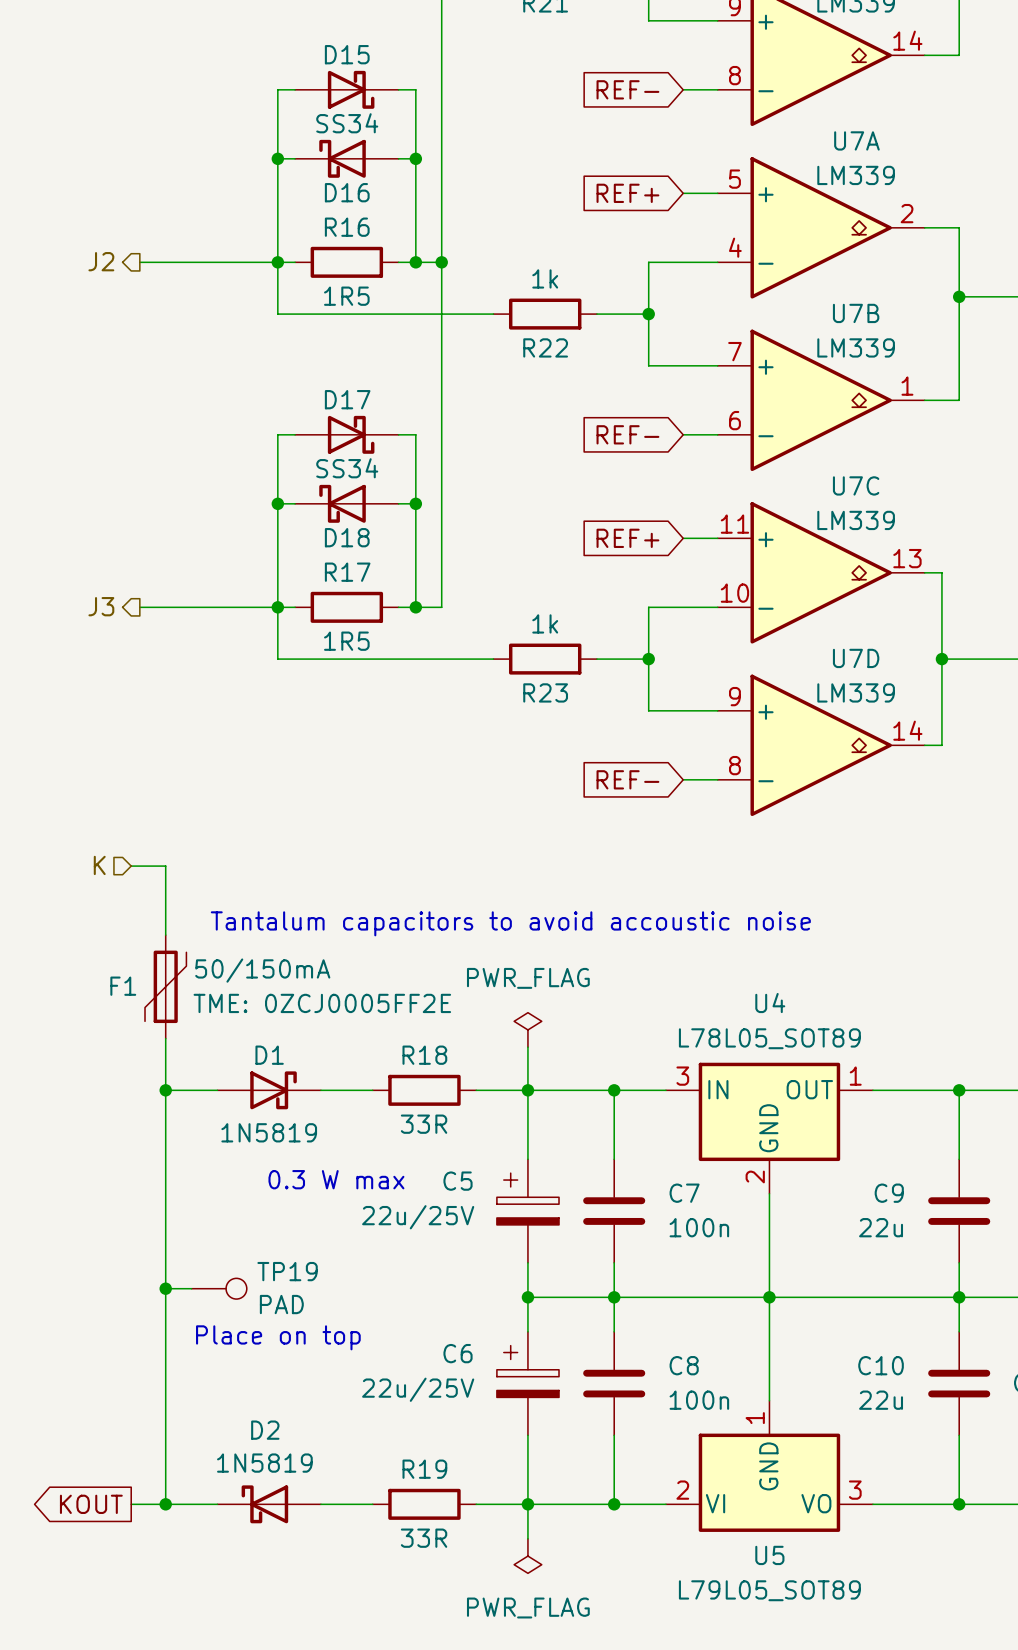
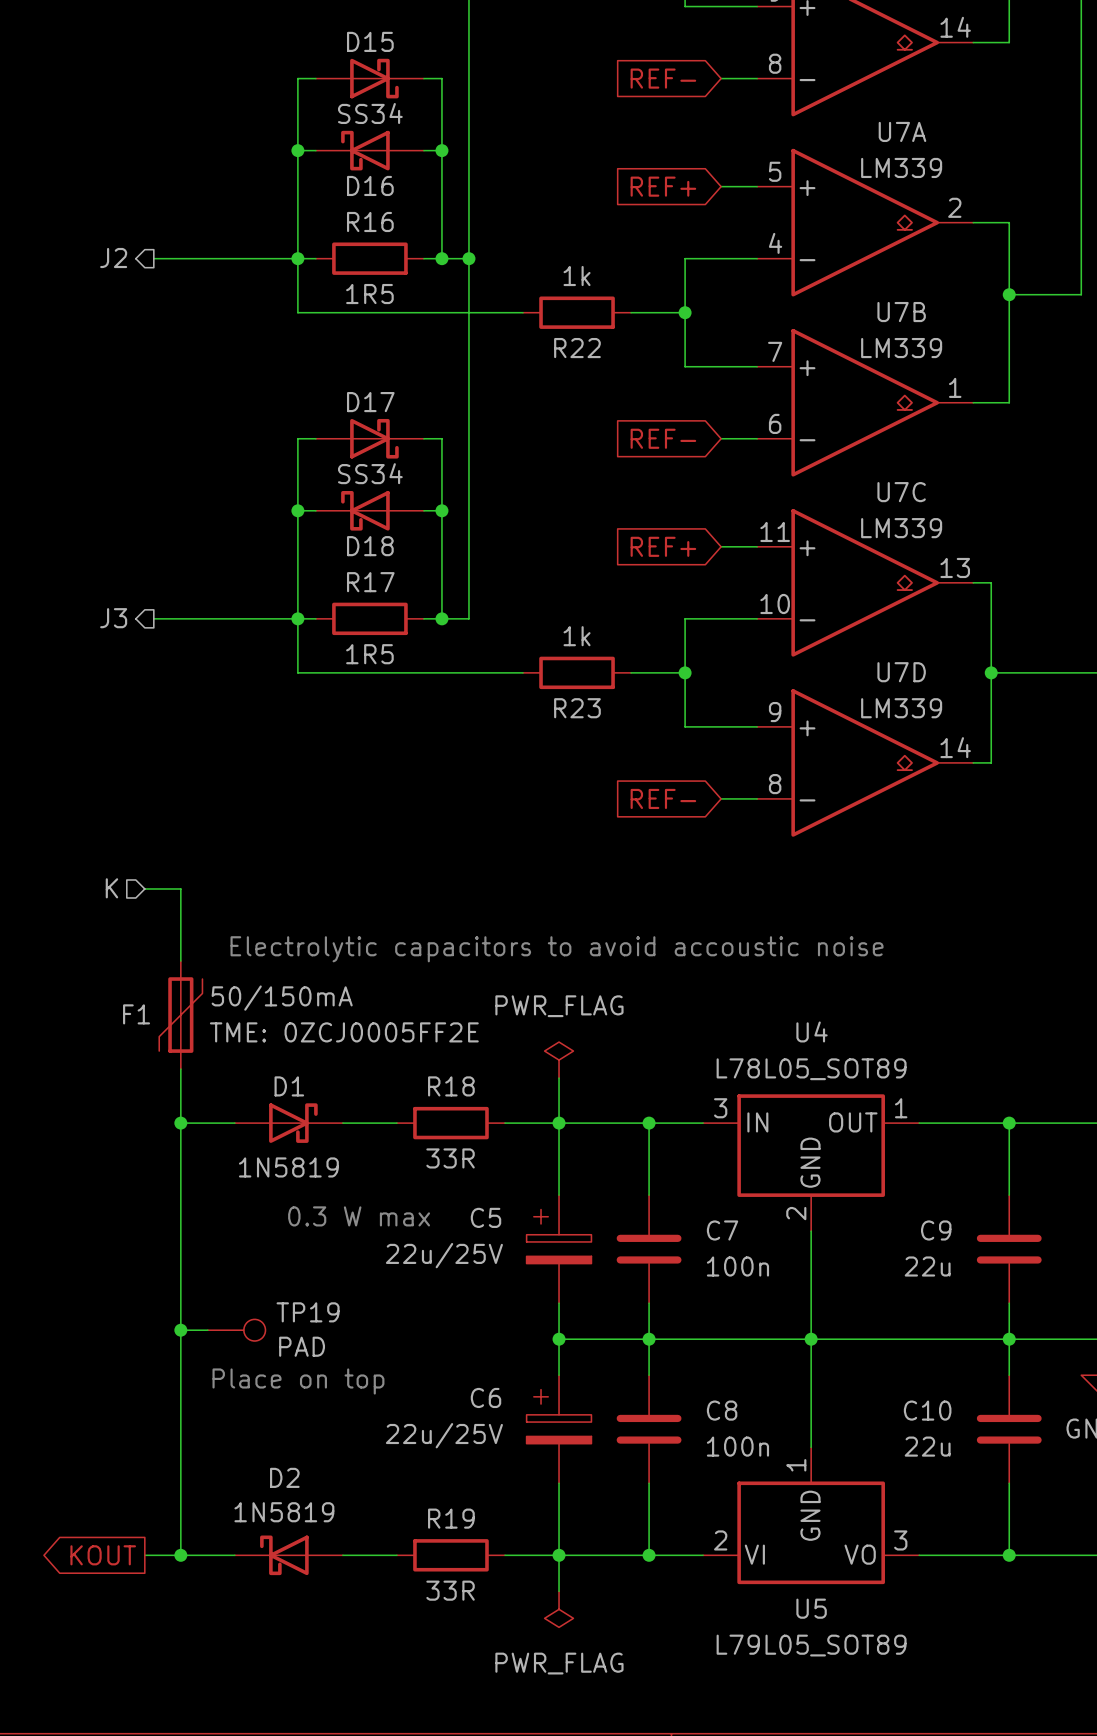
text: Tantalum capacitors to avoid accoustic noise (510, 923) -> Electrolytic capacitors to avoid accoustic noise (557, 949)

